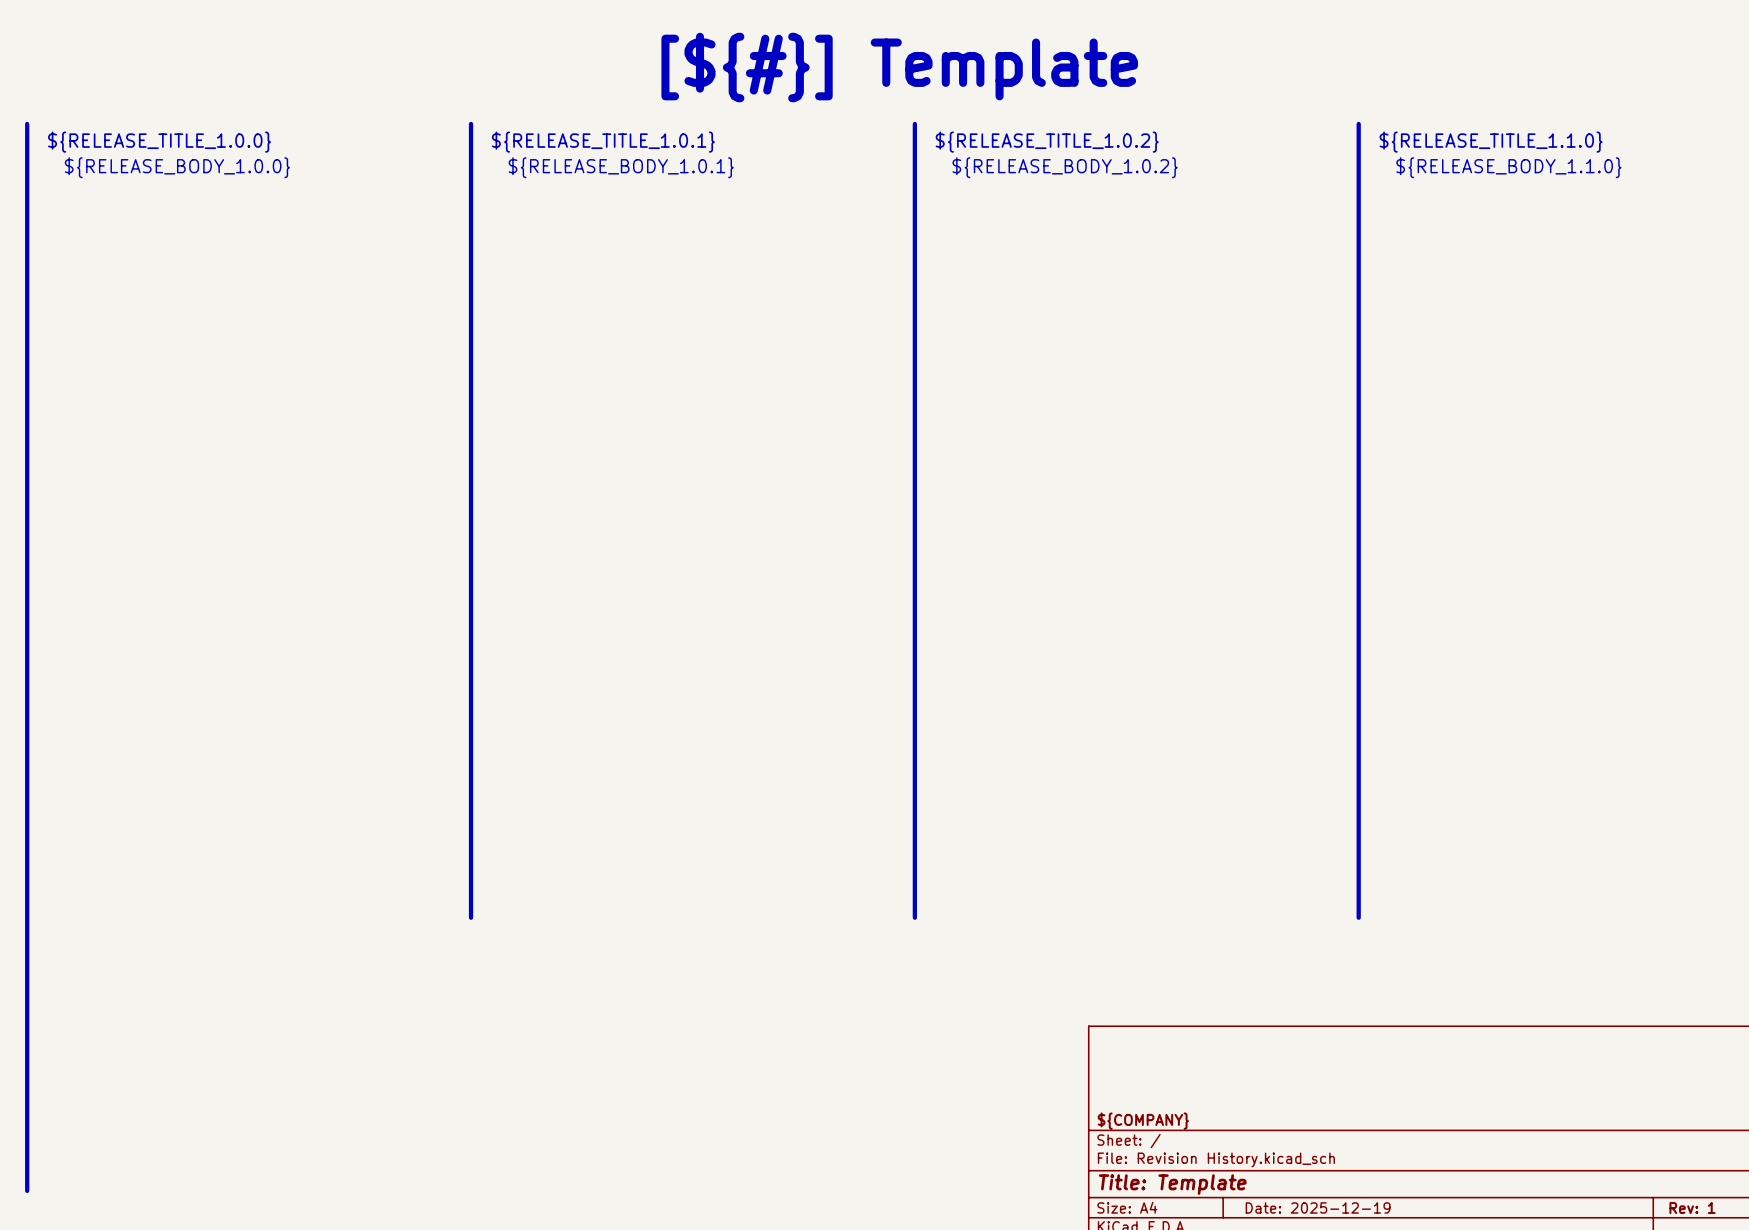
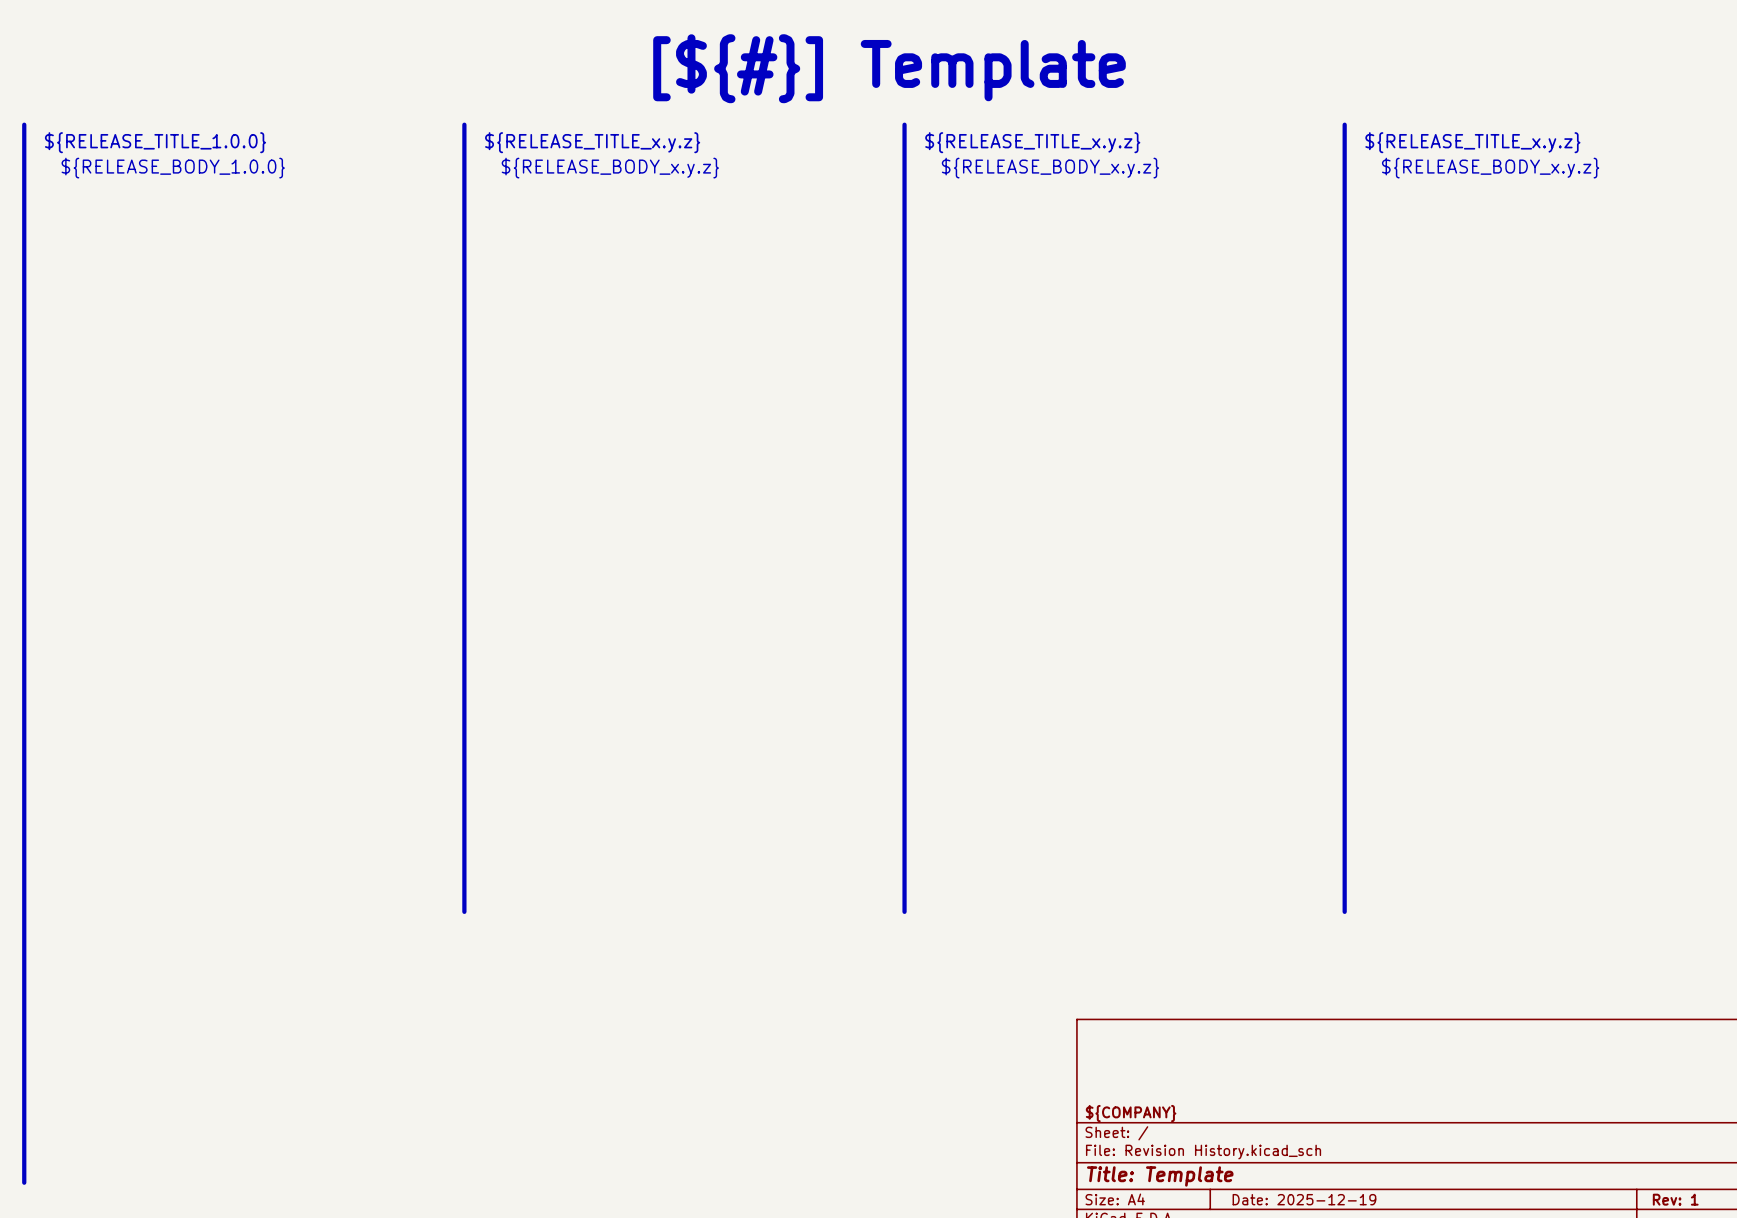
text: ${RELEASE_TITLE_1.0.1} (603, 142) -> ${RELEASE_TITLE_x.y.z} (592, 142)
text: ${RELEASE_TITLE_1.0.2} (1047, 142) -> ${RELEASE_TITLE_x.y.z} (1032, 142)
text: ${RELEASE_TITLE_1.1.0} (1491, 142) -> ${RELEASE_TITLE_x.y.z} (1472, 142)
text: ${RELEASE_BODY_1.0.1} (621, 167) -> ${RELEASE_BODY_x.y.z} (610, 168)
text: ${RELEASE_BODY_1.0.2} (1065, 167) -> ${RELEASE_BODY_x.y.z} (1050, 168)
text: ${RELEASE_BODY_1.1.0} (1508, 167) -> ${RELEASE_BODY_x.y.z} (1490, 168)

